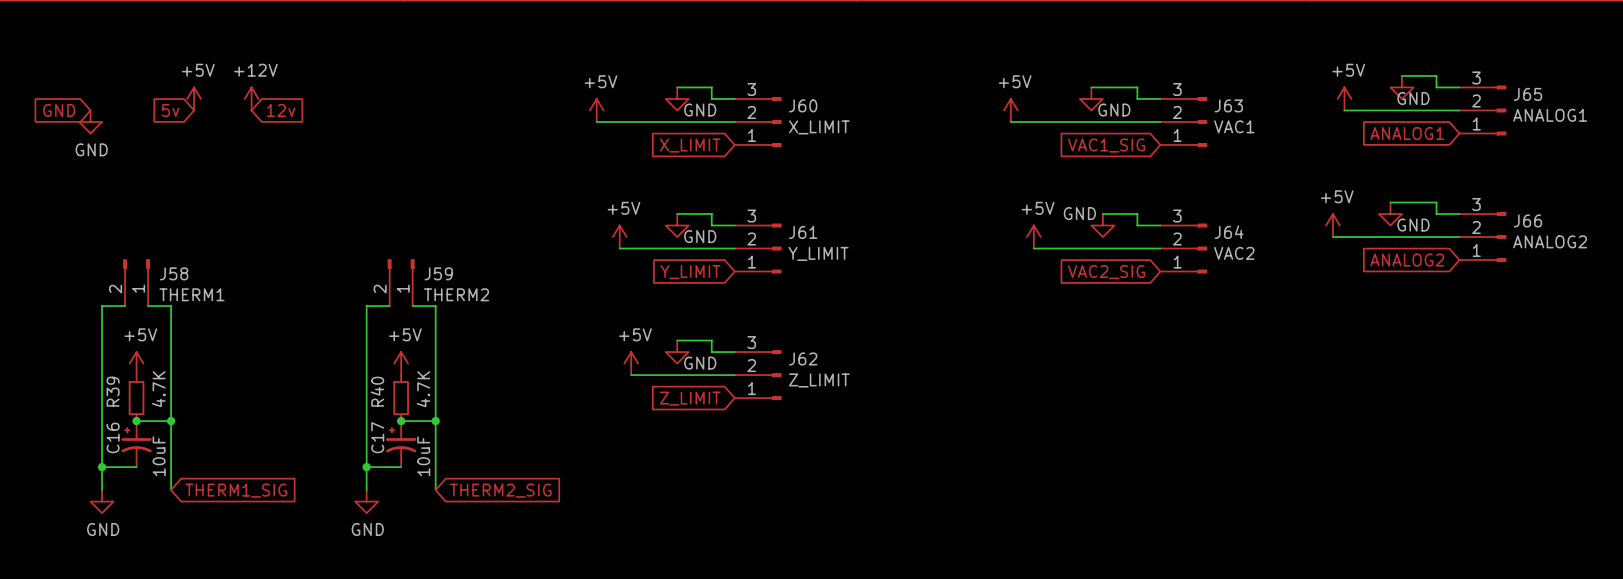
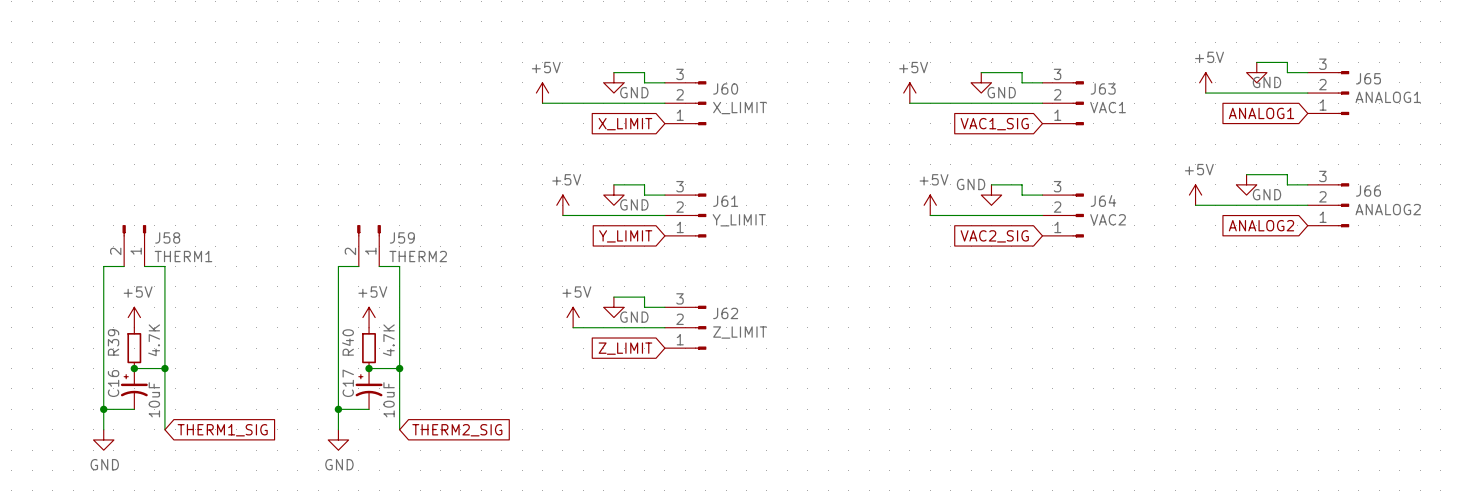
power symbol: +5V (194, 98) -> none
power symbol: +12V (251, 98) -> none
global label: GND (59, 110) -> none
global label: 5v (170, 110) -> none
global label: 12v (281, 110) -> none
power symbol: GND (90, 121) -> none

